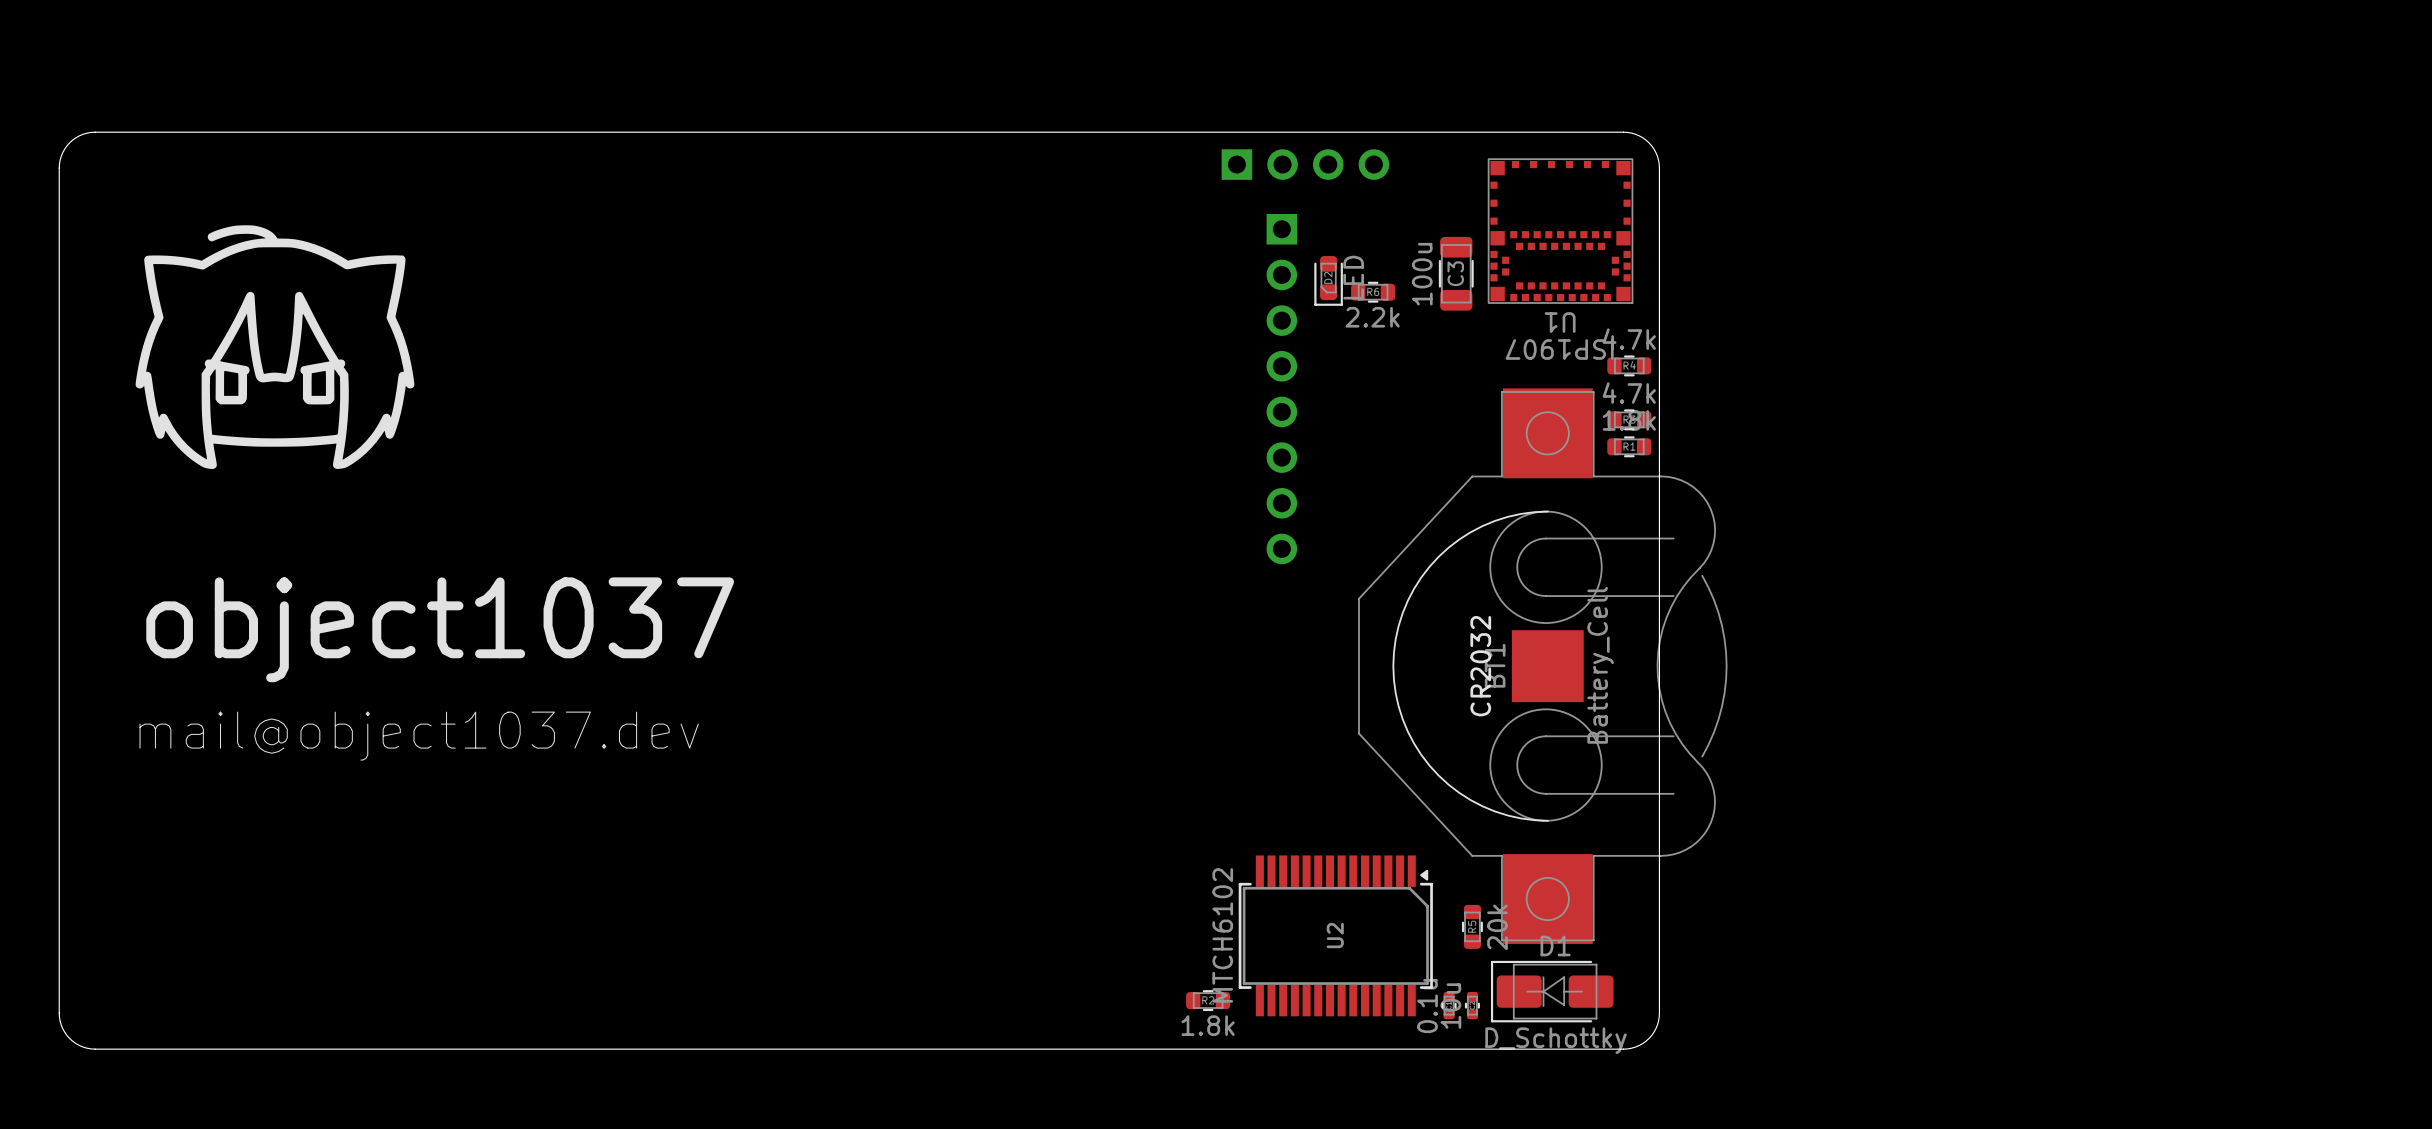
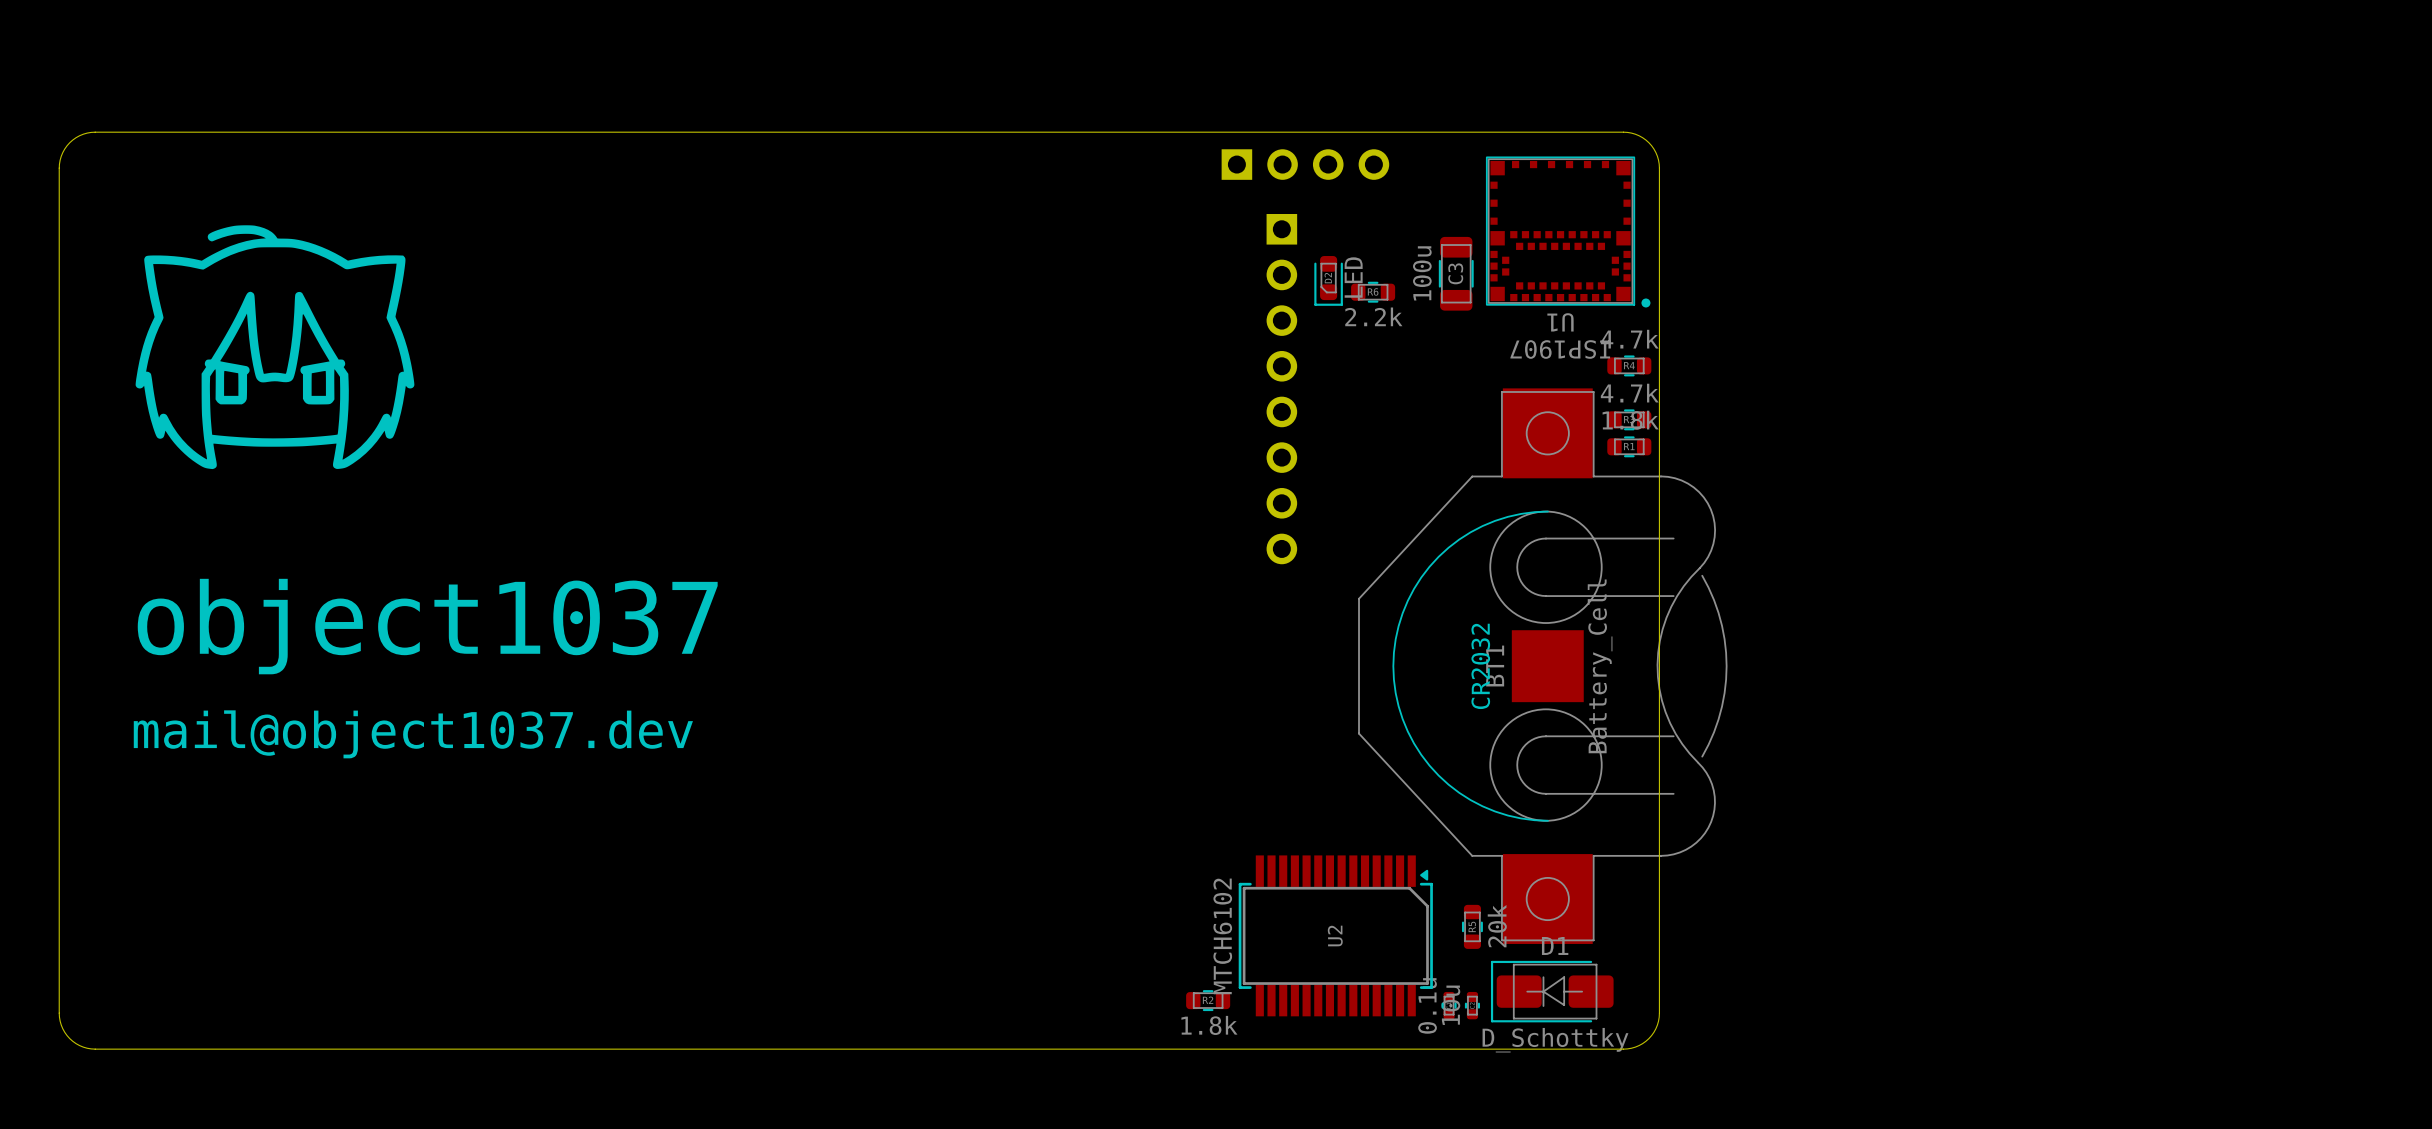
U1 footprint: [1487, 158, 1634, 304] -> [1485, 156, 1651, 308]

